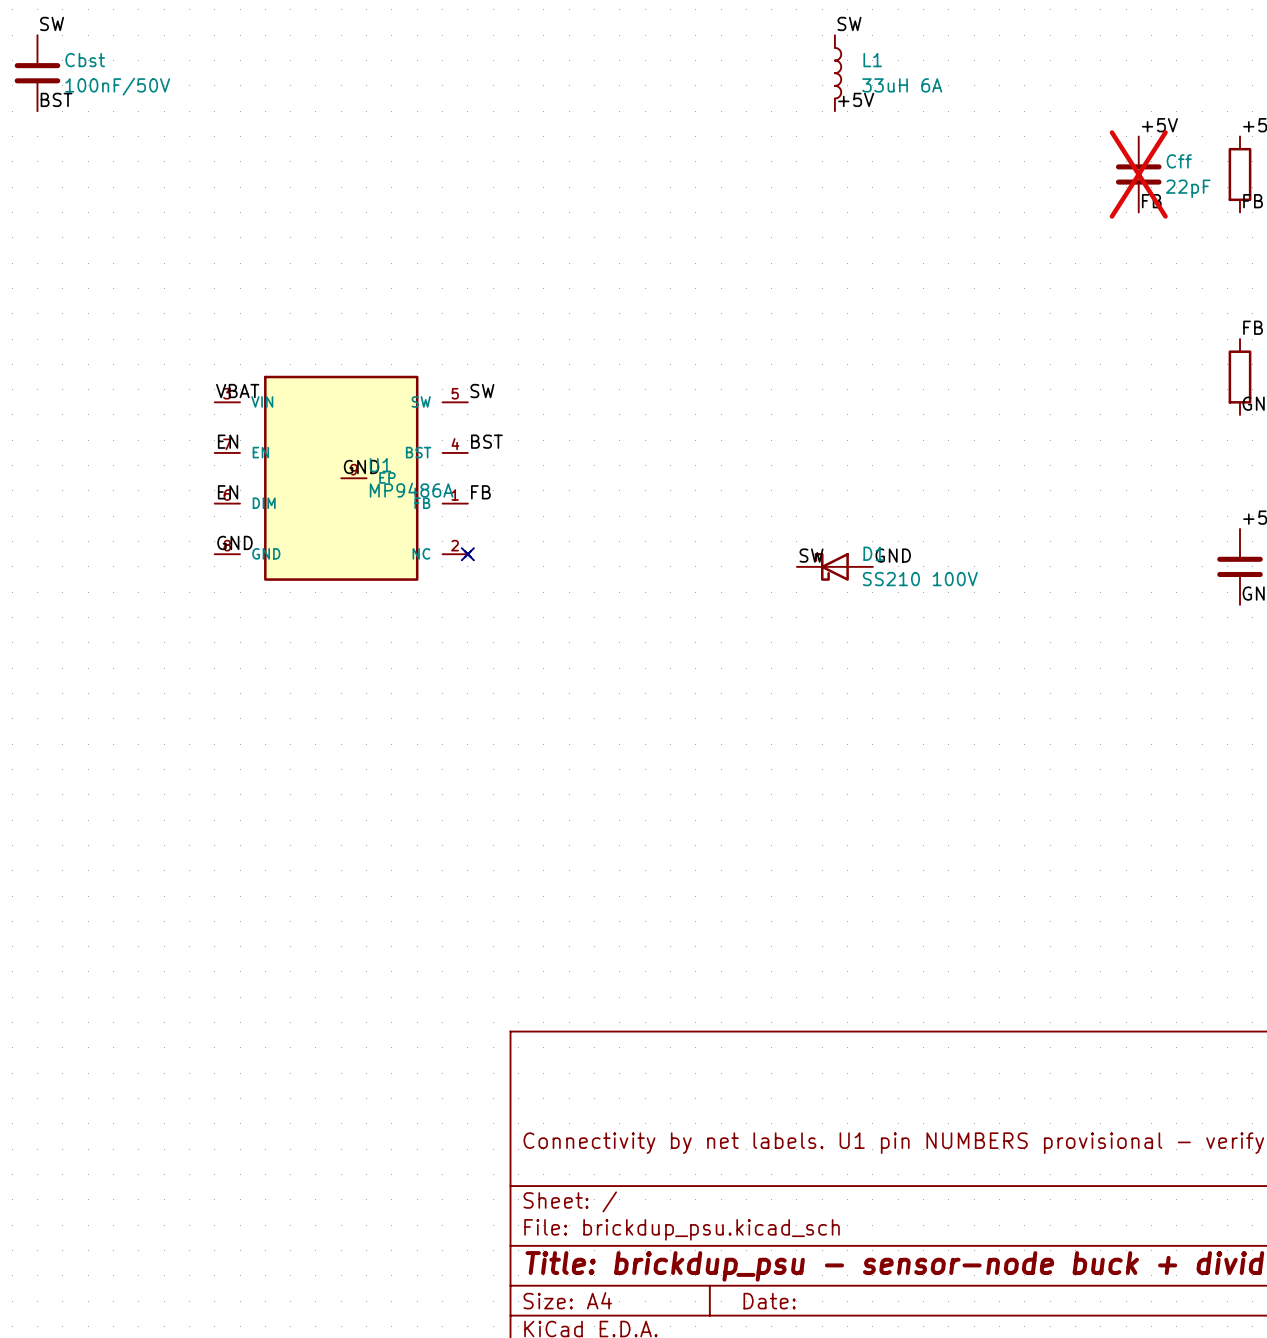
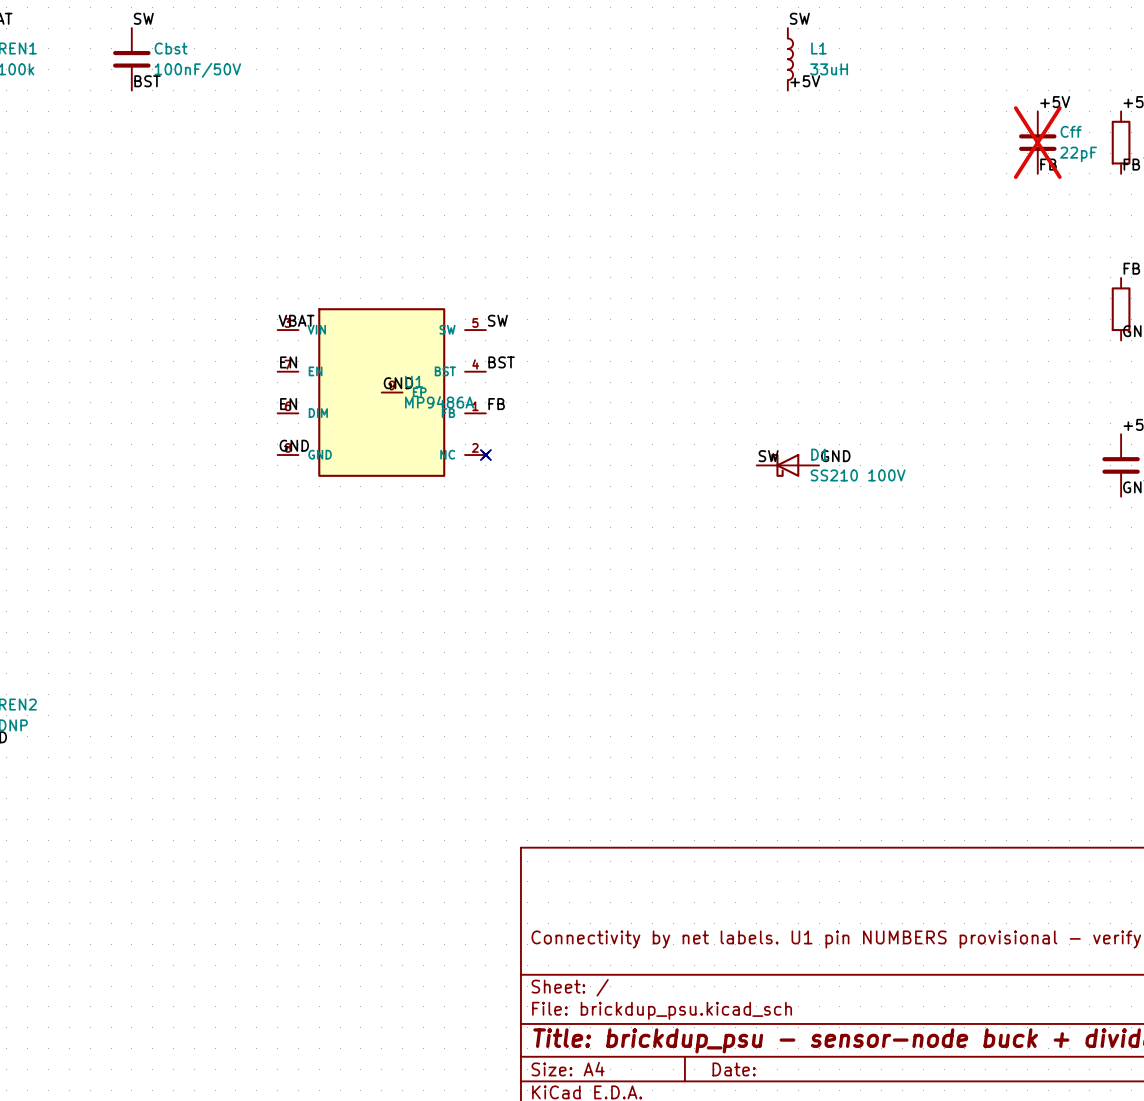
L1 value: 33uH 6A (902, 85) -> 33uH (829, 69)

